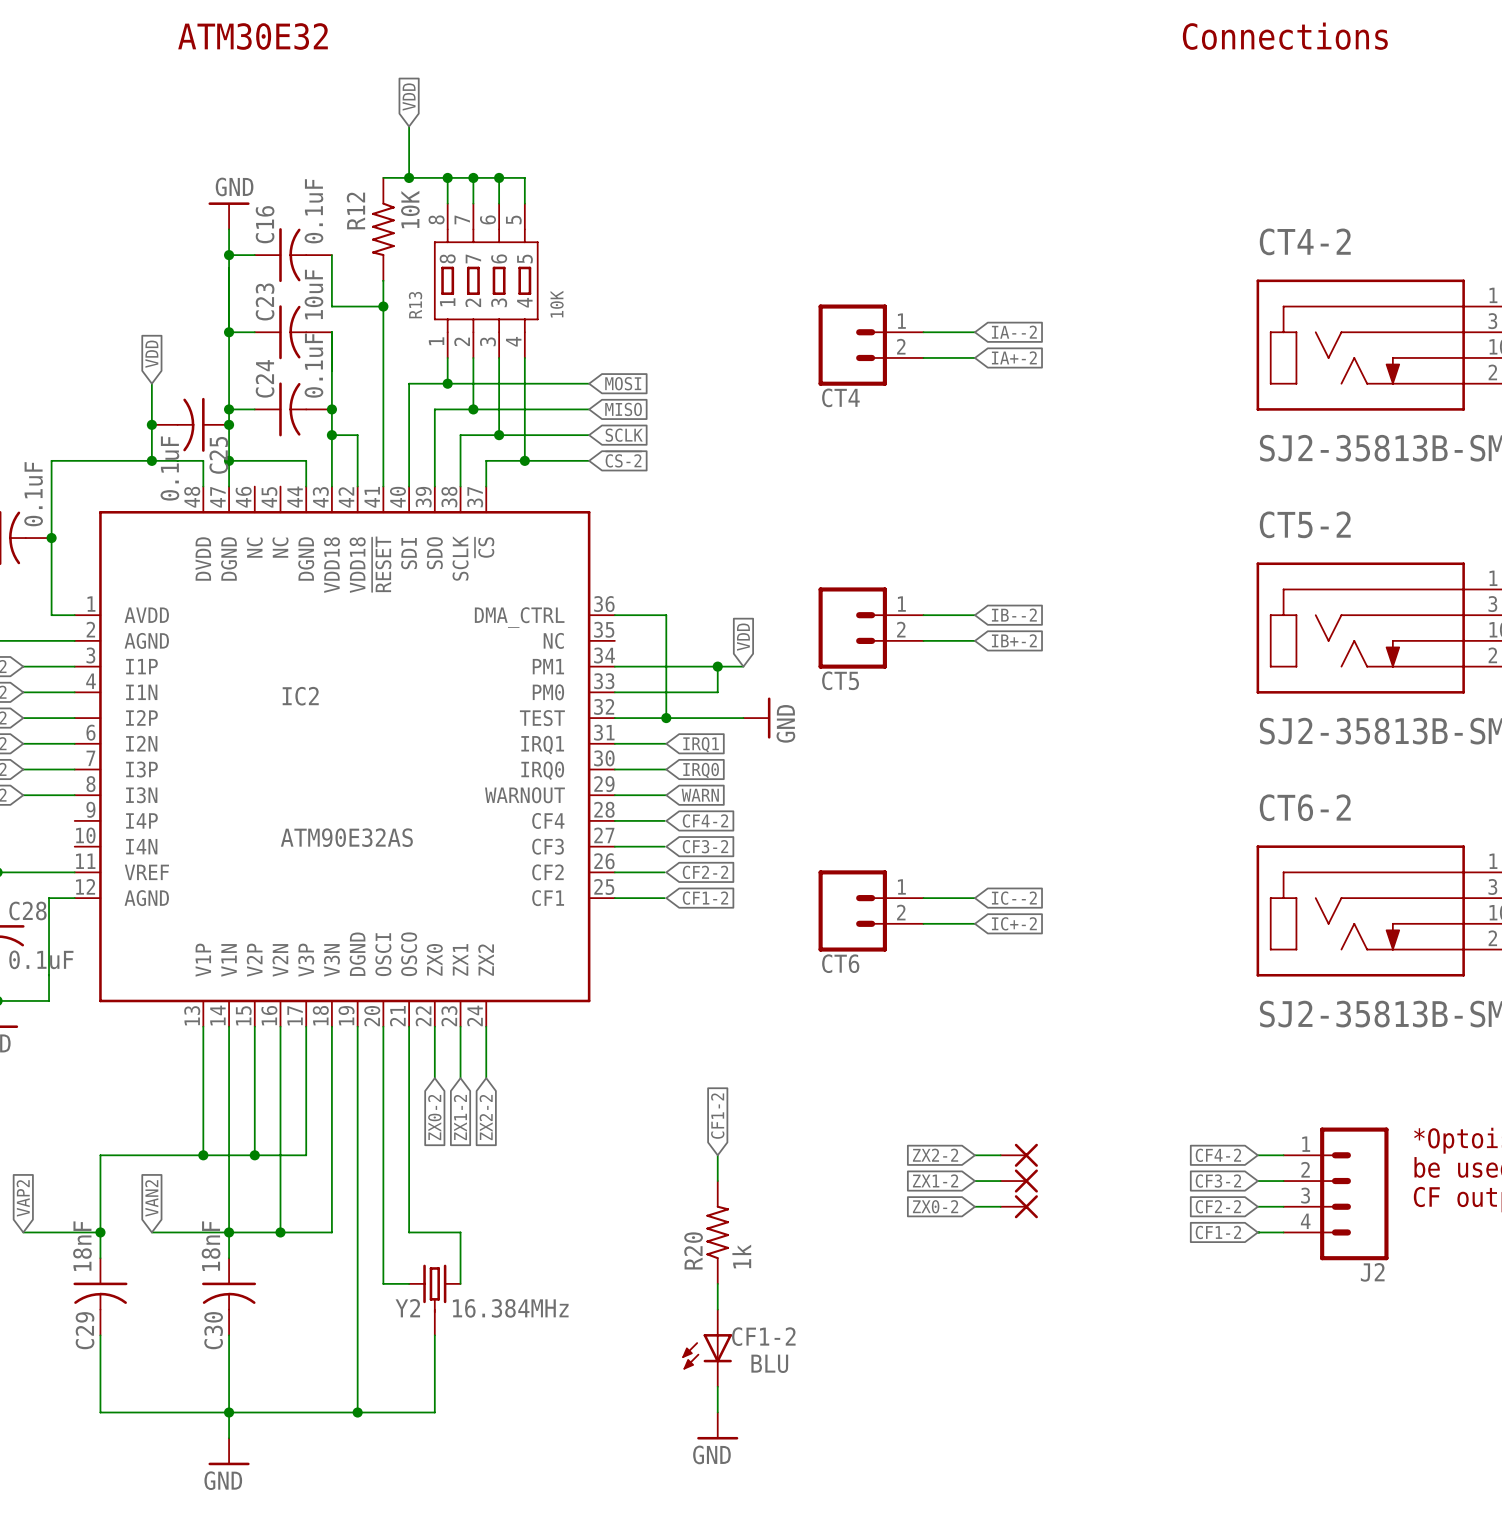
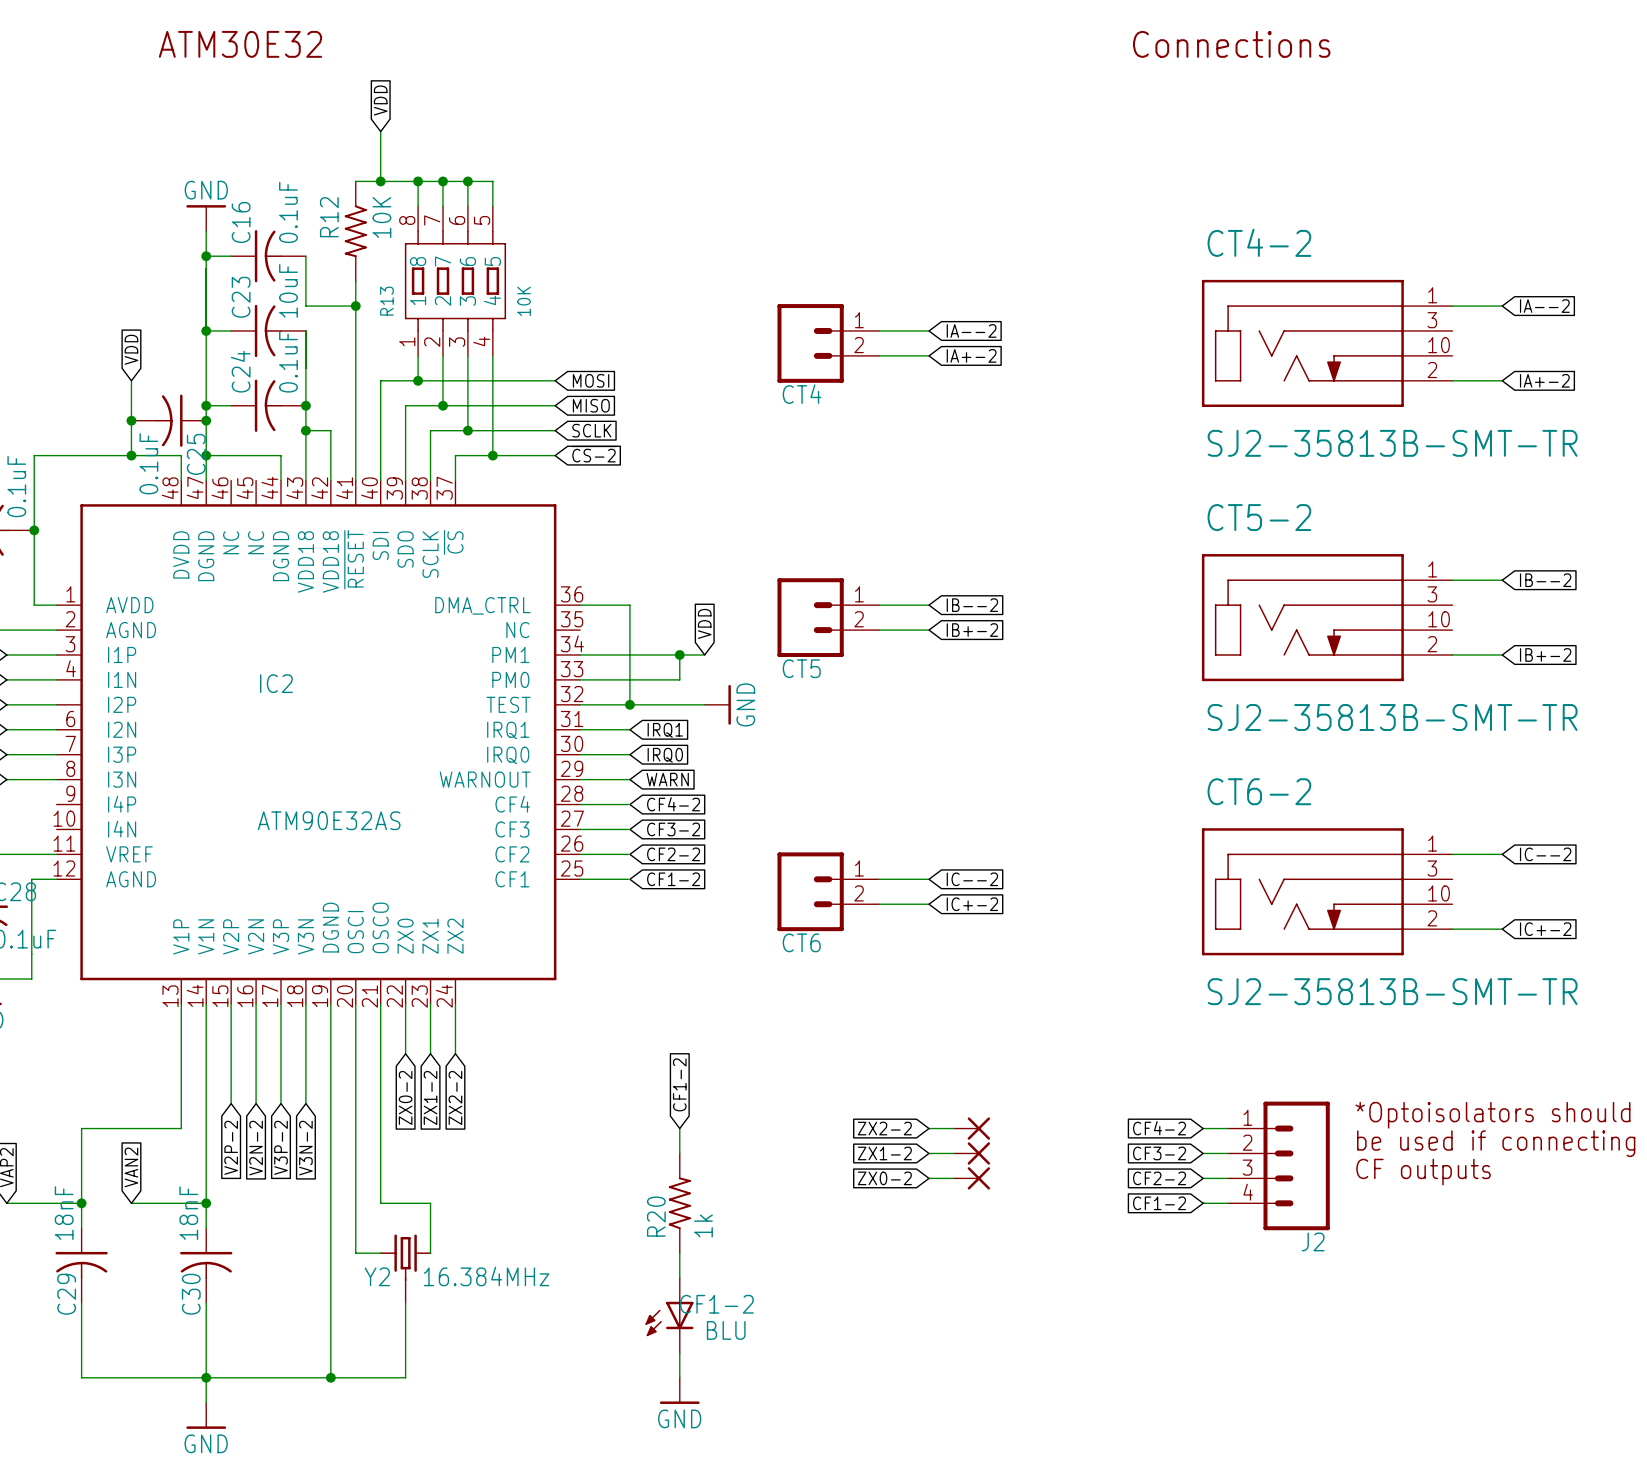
wire: (254, 1129) (254, 1155) -> none
wire: (280, 1129) (280, 1232) -> none
wire: (306, 1129) (306, 1155) (203, 1155) -> none
wire: (331, 1129) (331, 1232) (229, 1232) -> none
junction: (203, 1155) -> none
junction: (254, 1155) -> none
global label: none -> V2P-2 (231, 1147)
global label: none -> V2N-2 (256, 1148)
global label: none -> V3P-2 (280, 1147)
global label: none -> V3N-2 (305, 1148)
junction: (280, 1232) -> none

